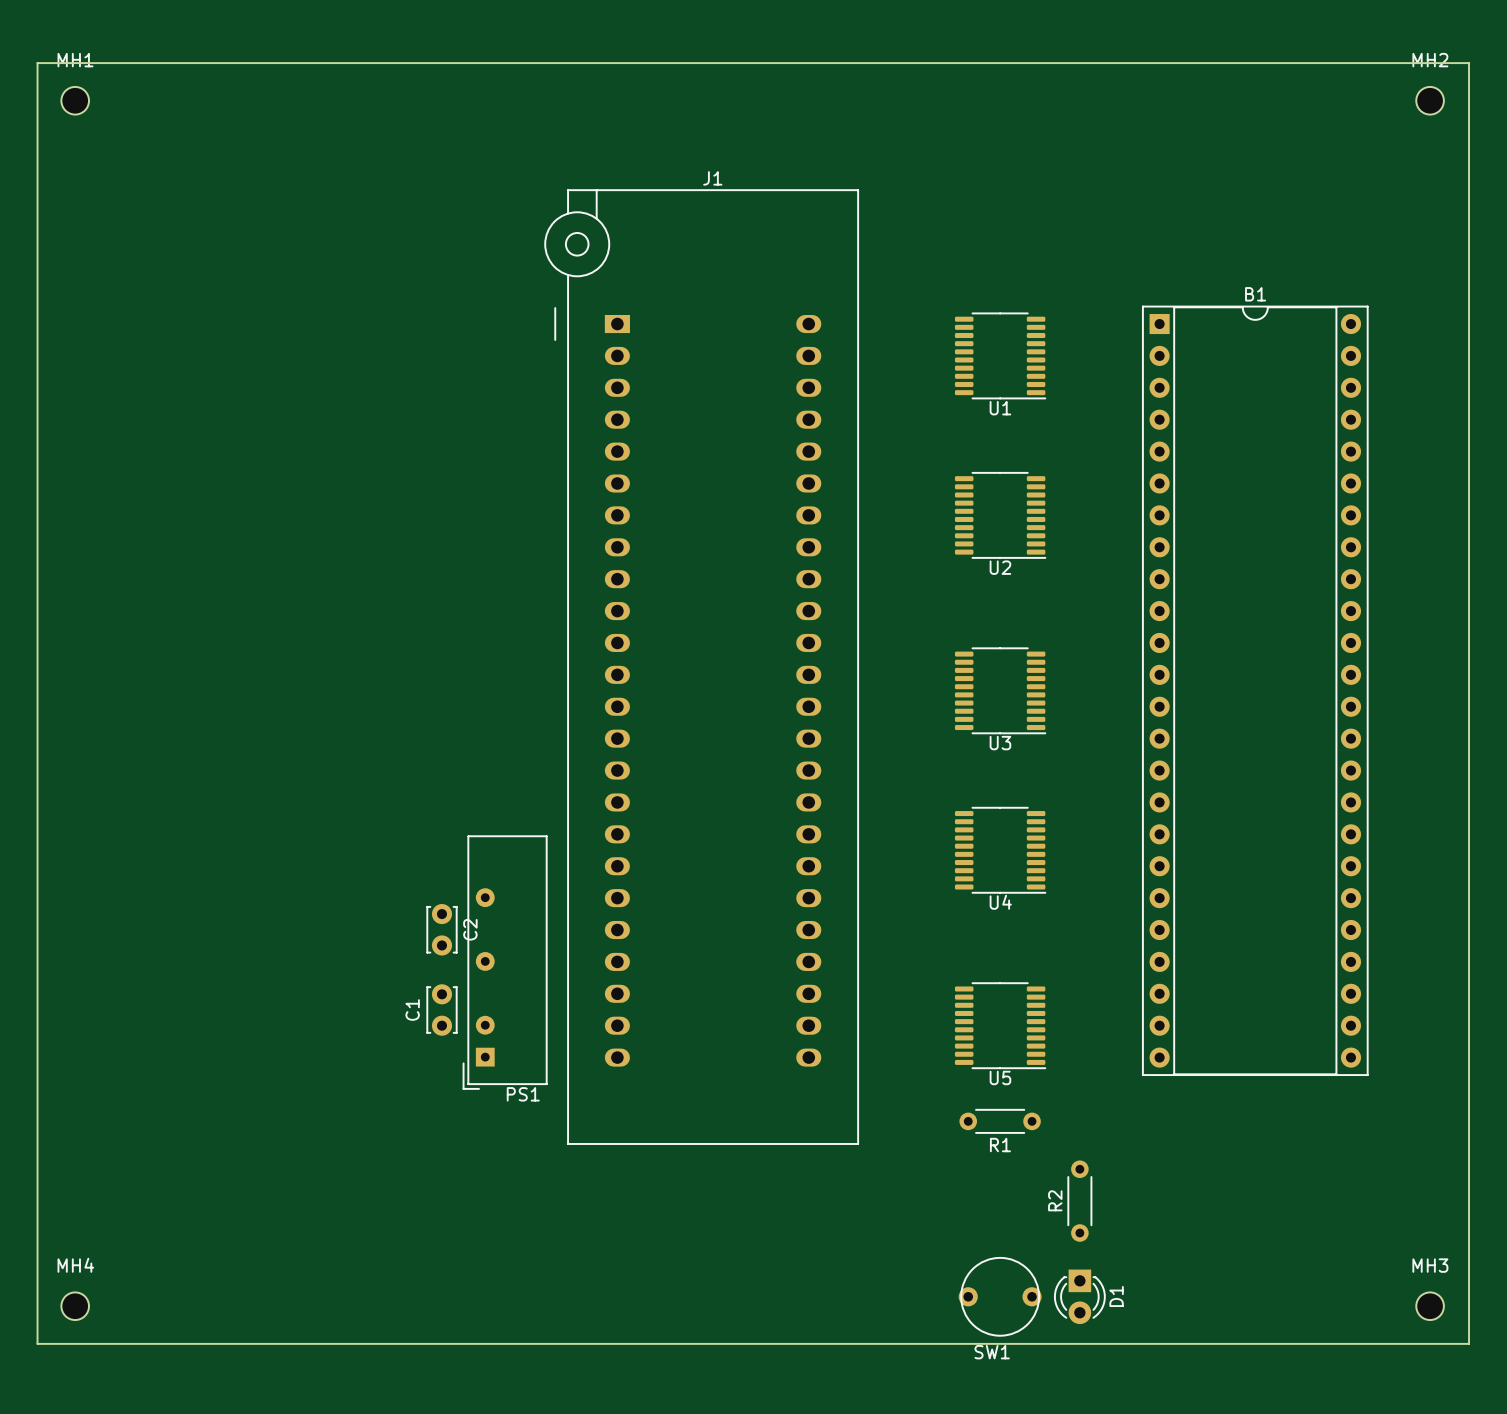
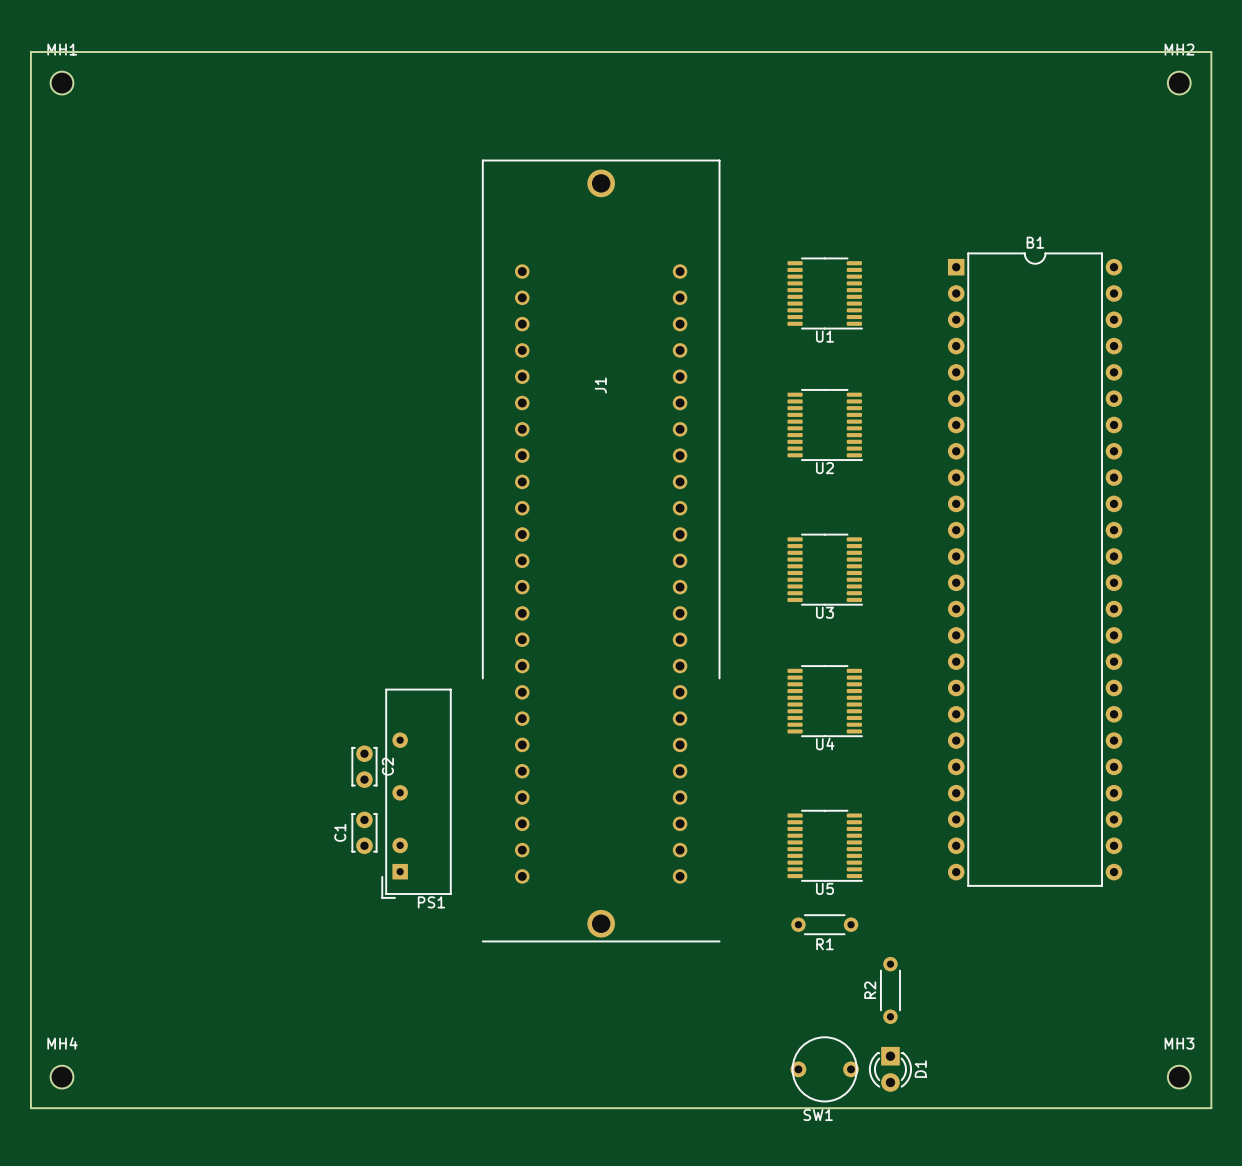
J1 name position: J1 (712, 178) -> J1 (600, 385)
J1 footprint: [544, 189, 859, 1145] -> [482, 159, 721, 942]
B1 footprint: [1142, 305, 1369, 1076] -> [947, 252, 1123, 887]

